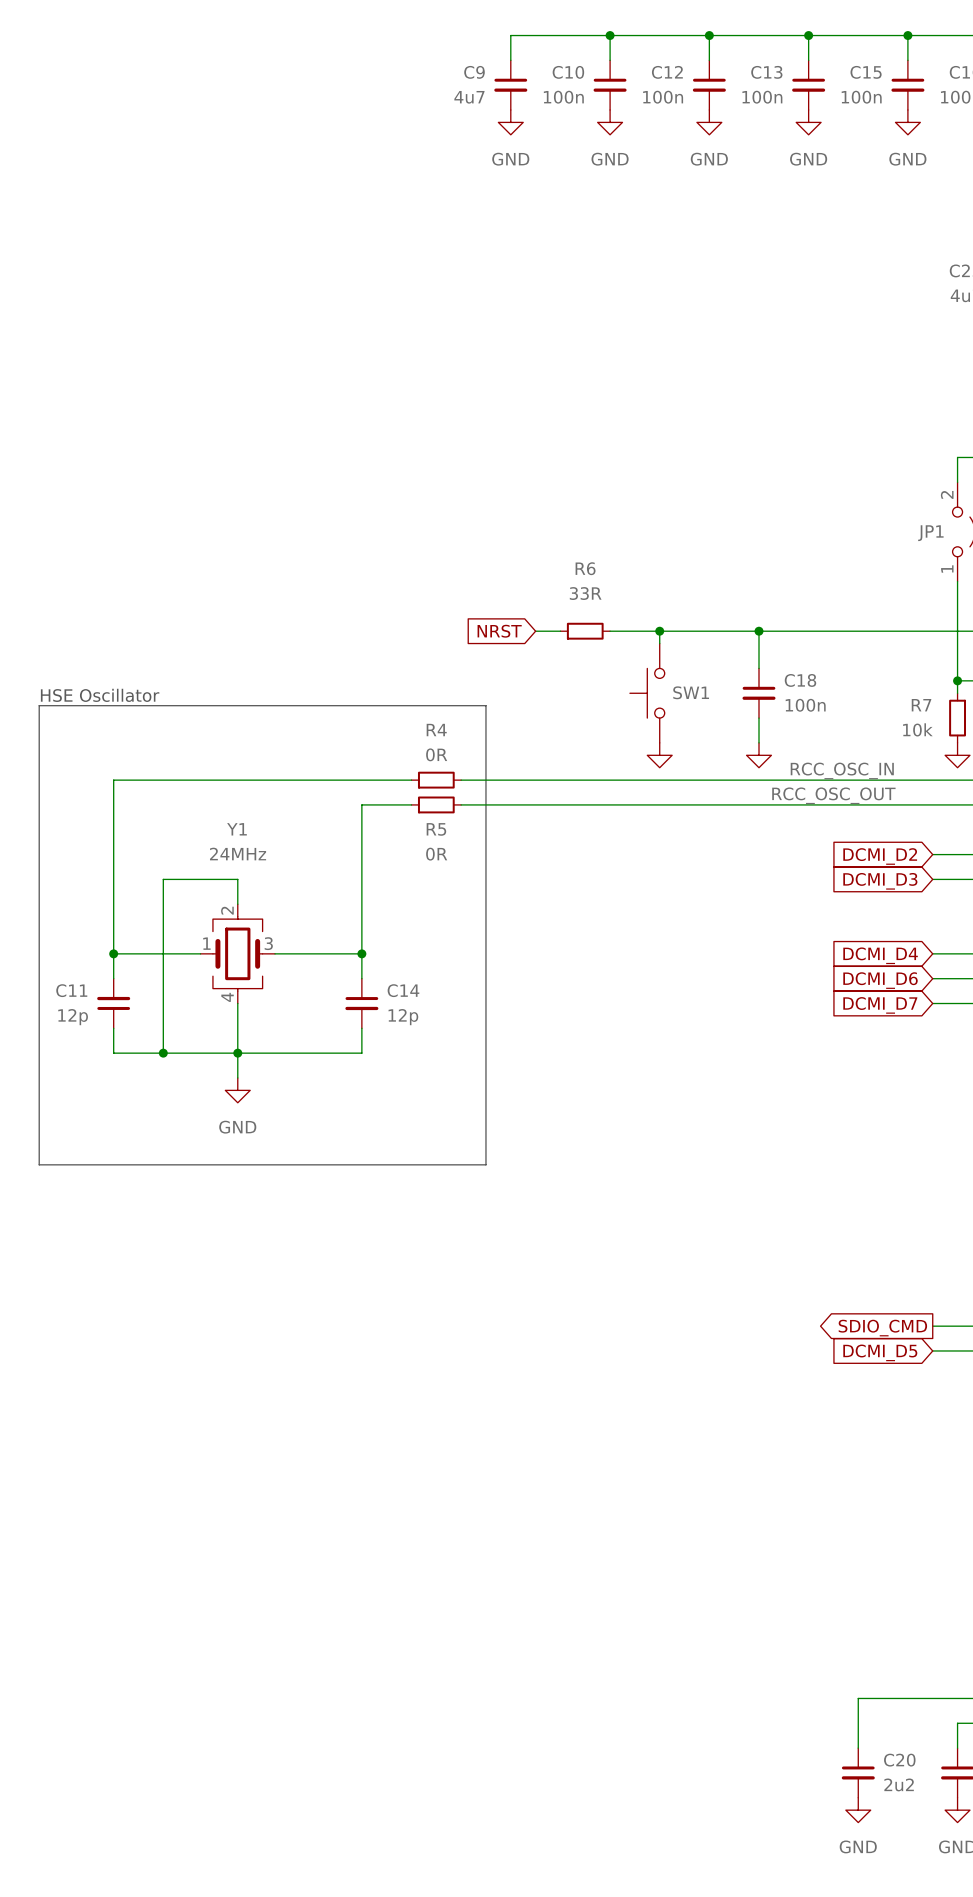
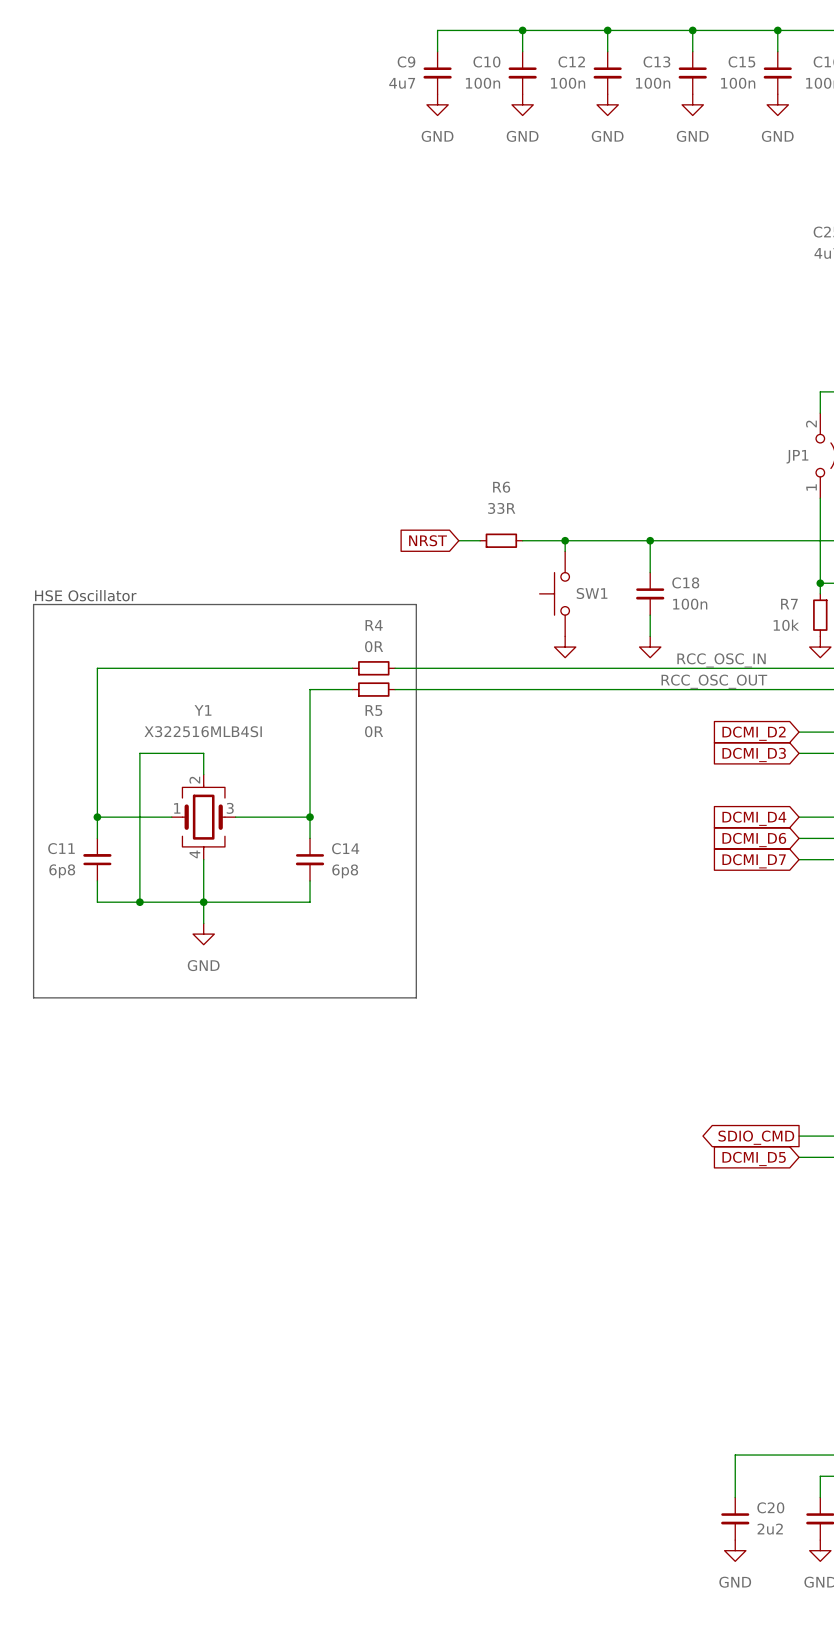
Y1 value: 24MHz (238, 854) -> X322516MLB4SI (203, 731)
C11 value: 12p (73, 1017) -> 6p8 (62, 871)
C14 value: 12p (403, 1017) -> 6p8 (345, 871)

